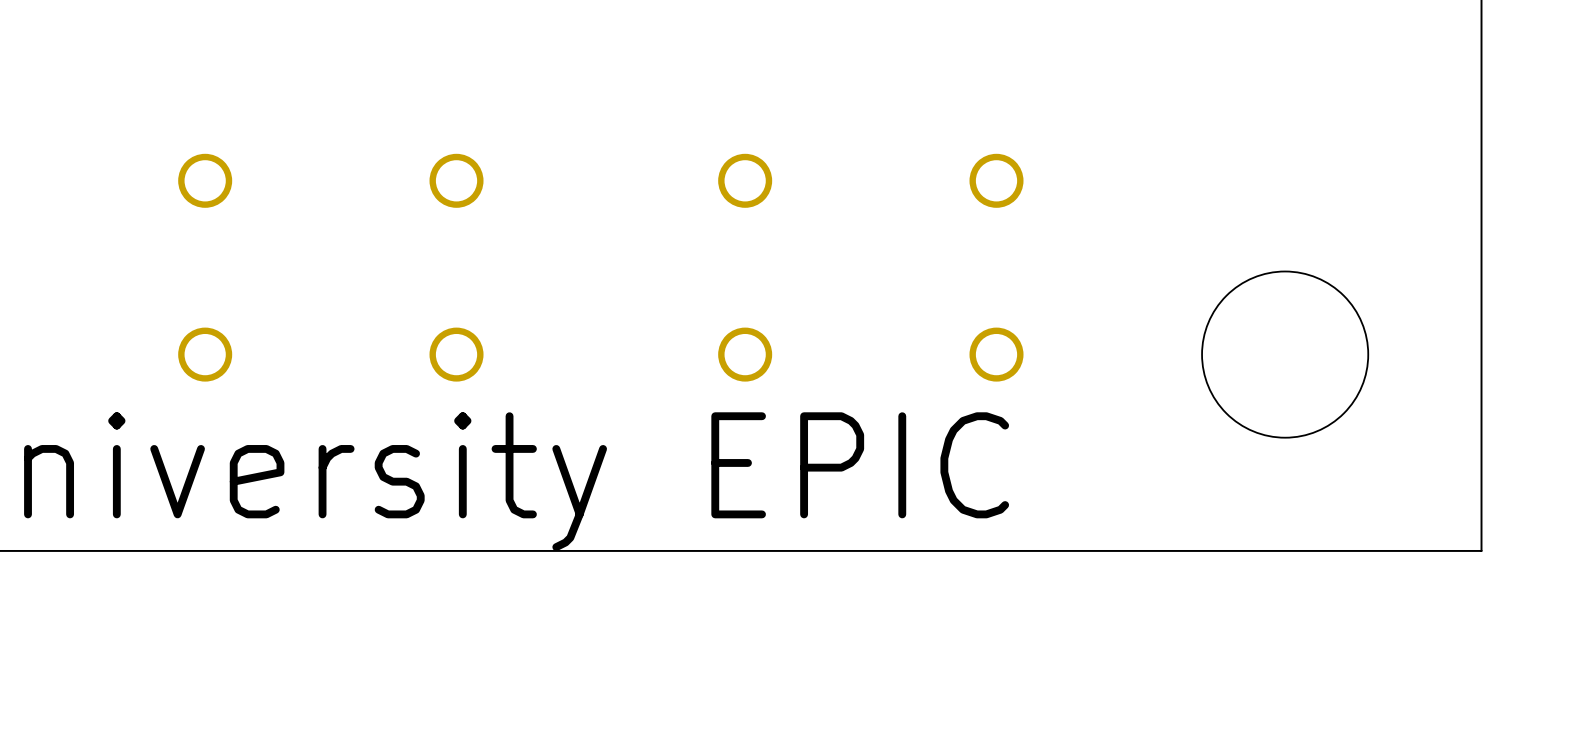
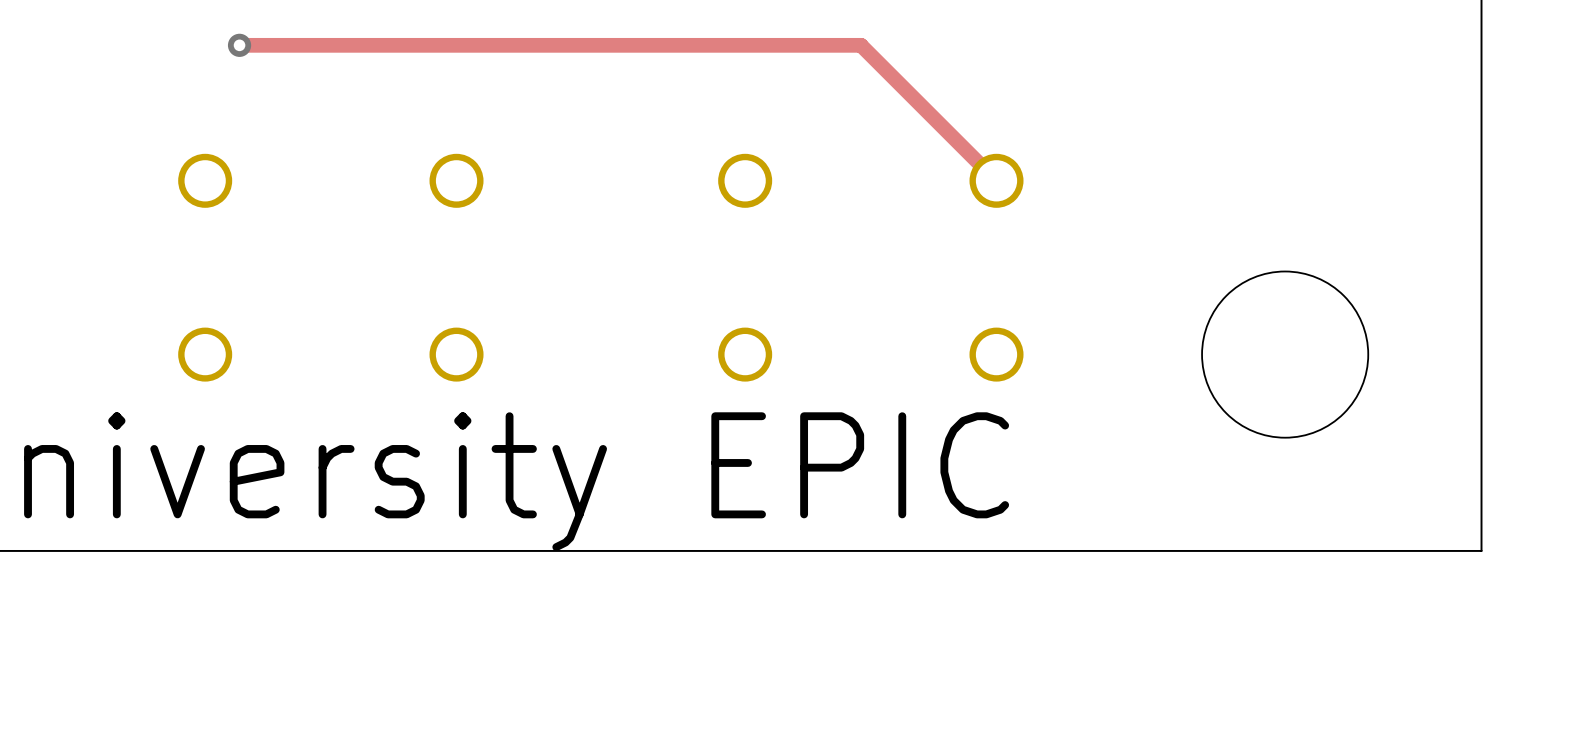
track: none -> (239, 45) (861, 45) (996, 180)
via: none -> (239, 45)

